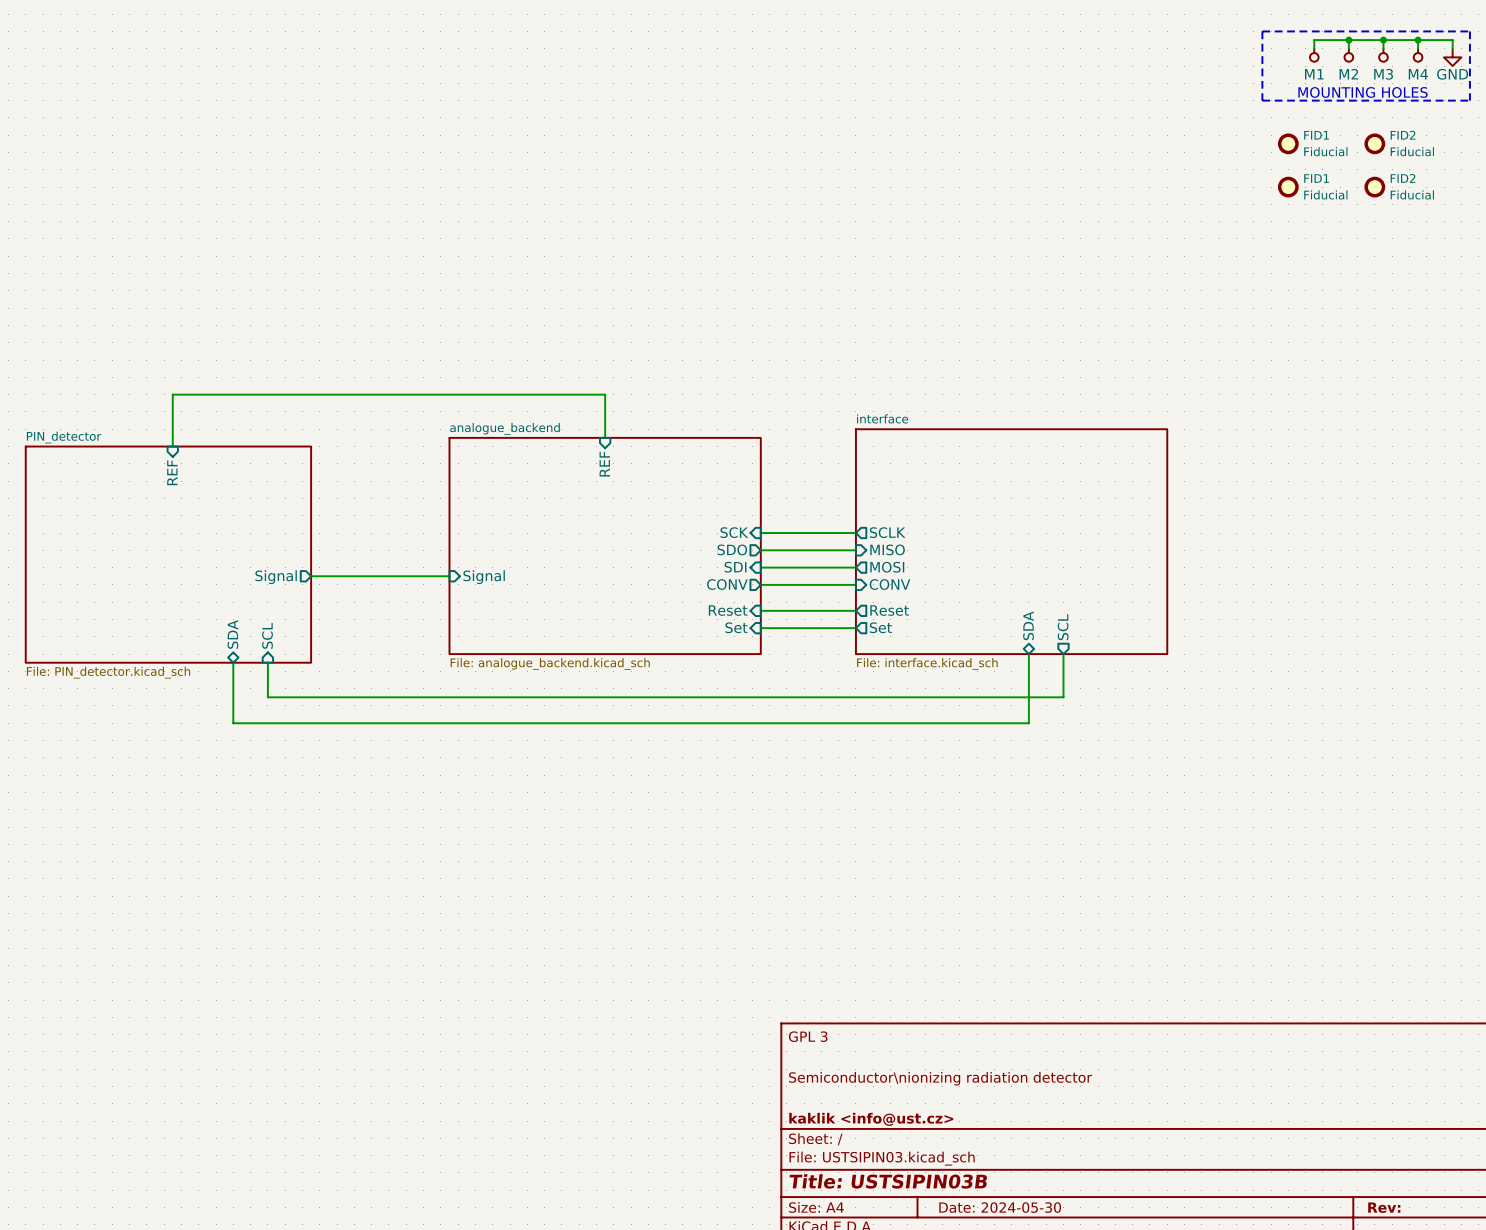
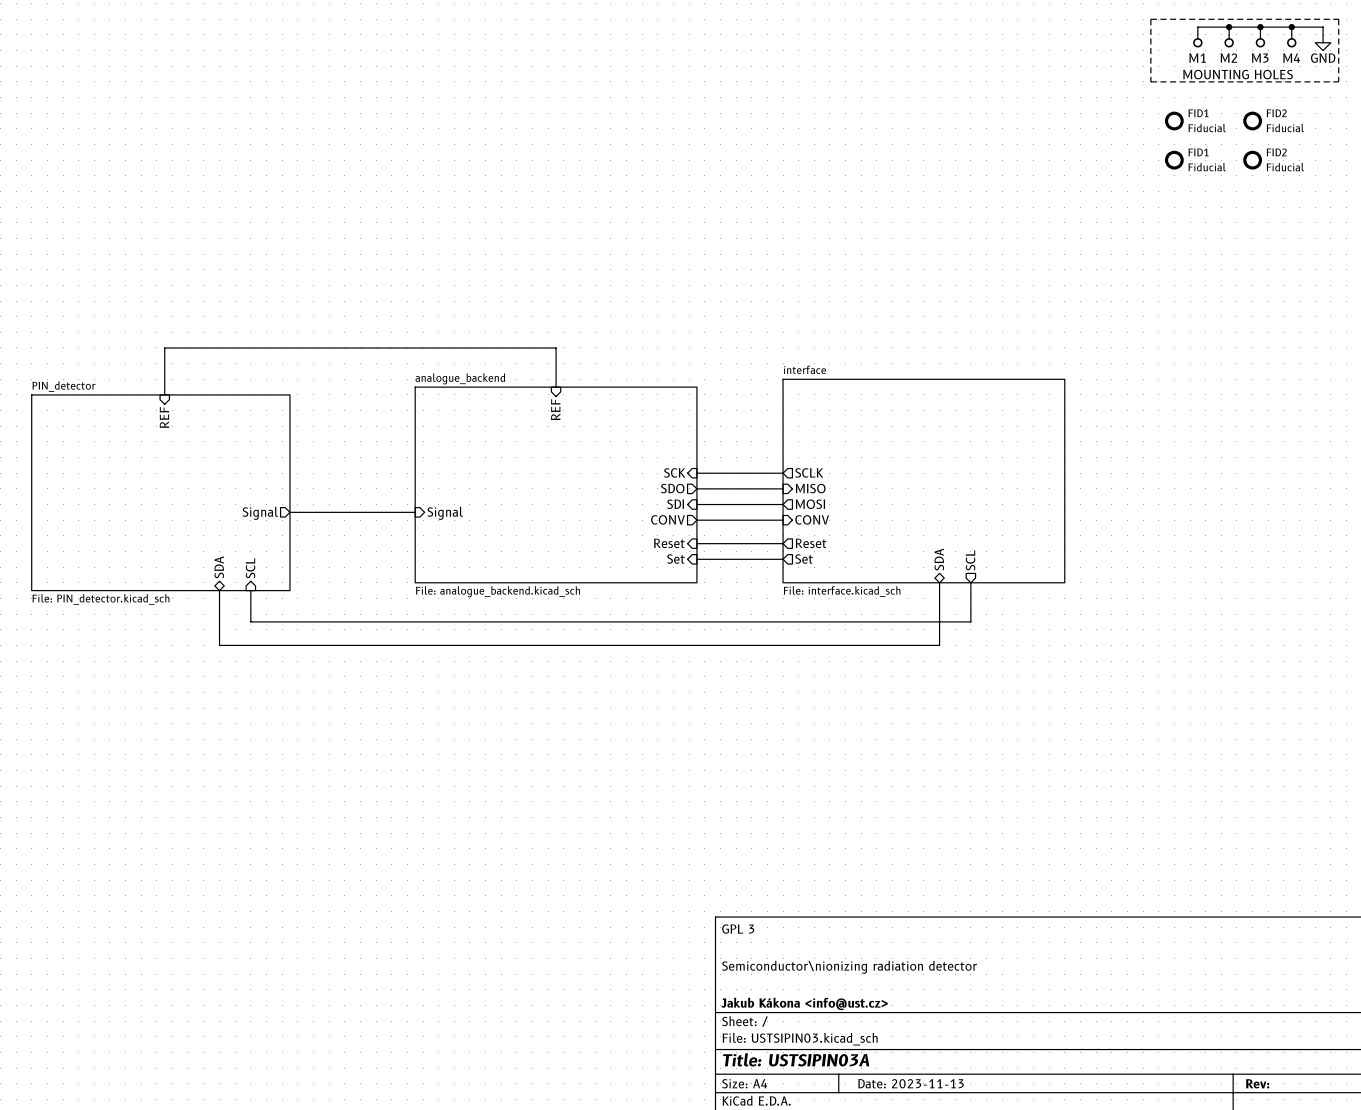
title block: kaklik <info@ust.cz> (871, 1119) -> Jakub Kákona <info@ust.cz> (804, 1003)
title block: Title: USTSIPIN03B (888, 1181) -> Title: USTSIPIN03A (796, 1059)
title block: Date: 2024-05-30 (1000, 1207) -> Date: 2023-11-13 (910, 1083)

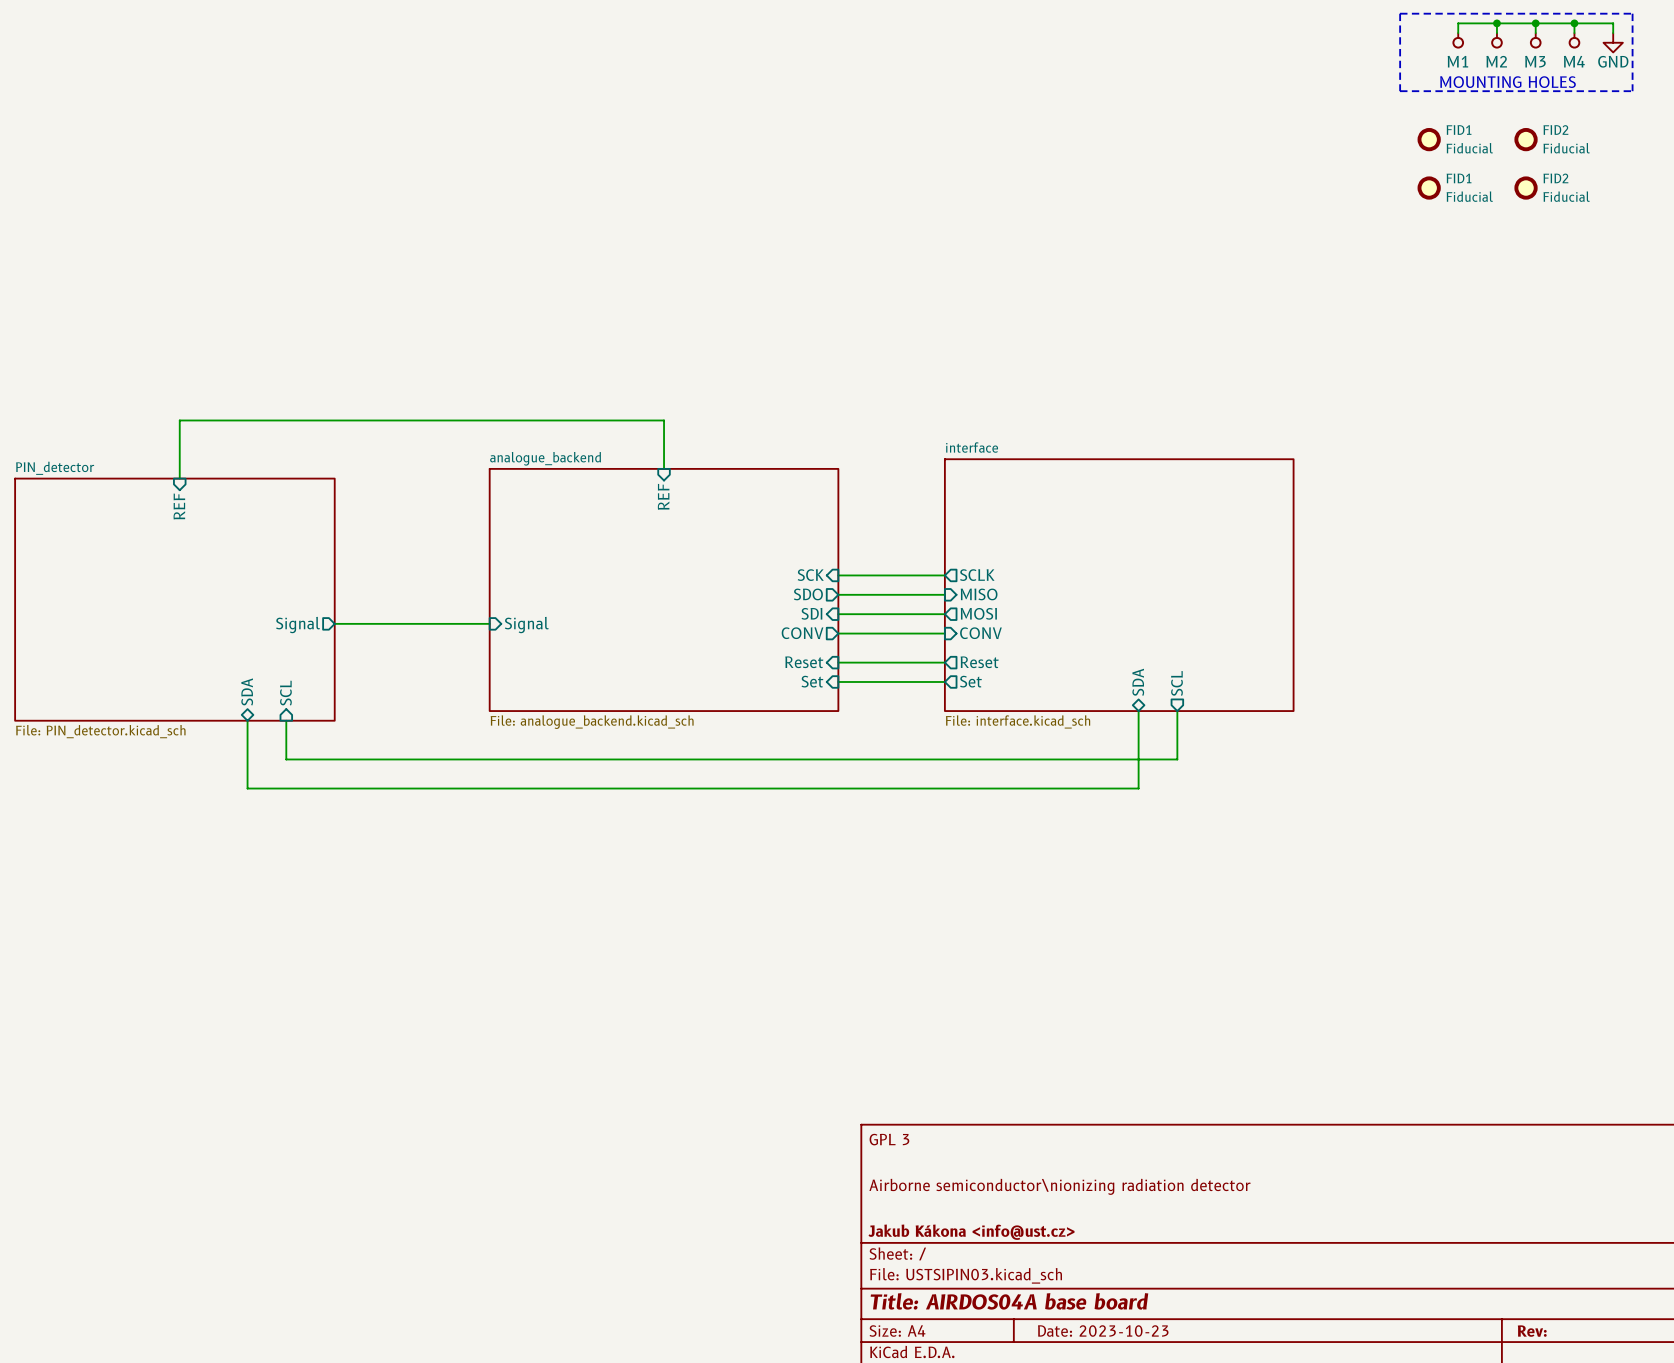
title block: Semiconductor\nionizing radiation detector (849, 967) -> Airborne semiconductor\nionizing radiation detector (1059, 1186)
title block: Title: USTSIPIN03A (796, 1059) -> Title: AIRDOS04A base board (1009, 1301)
title block: Date: 2023-11-13 (910, 1083) -> Date: 2023-10-23 (1103, 1331)

